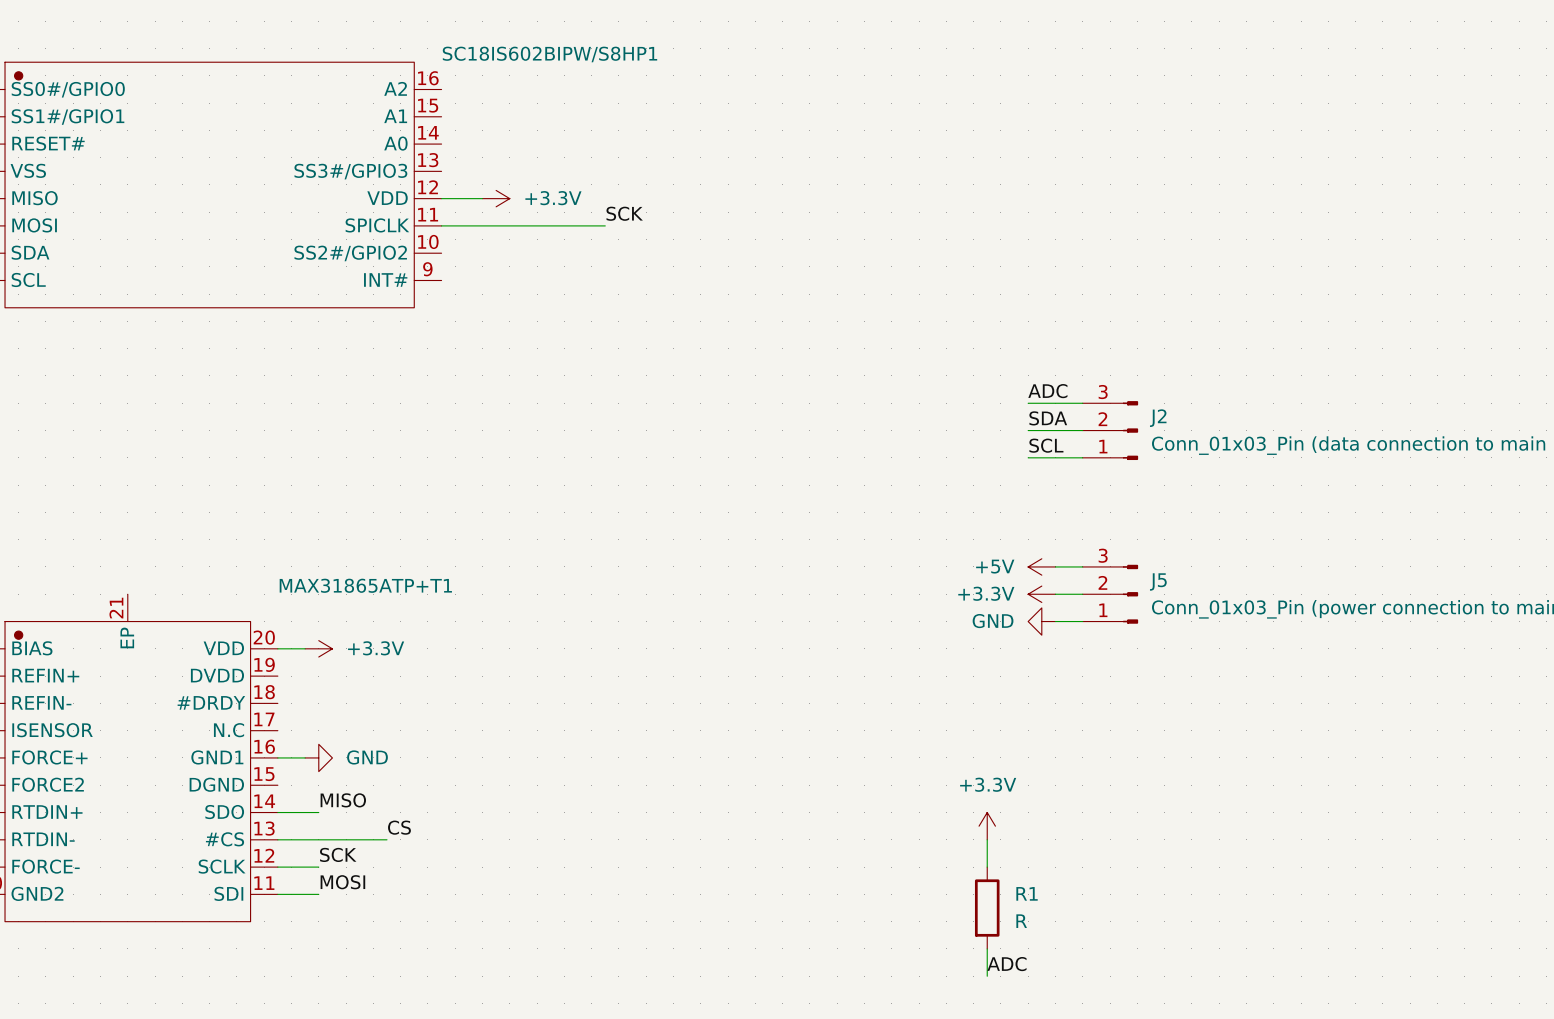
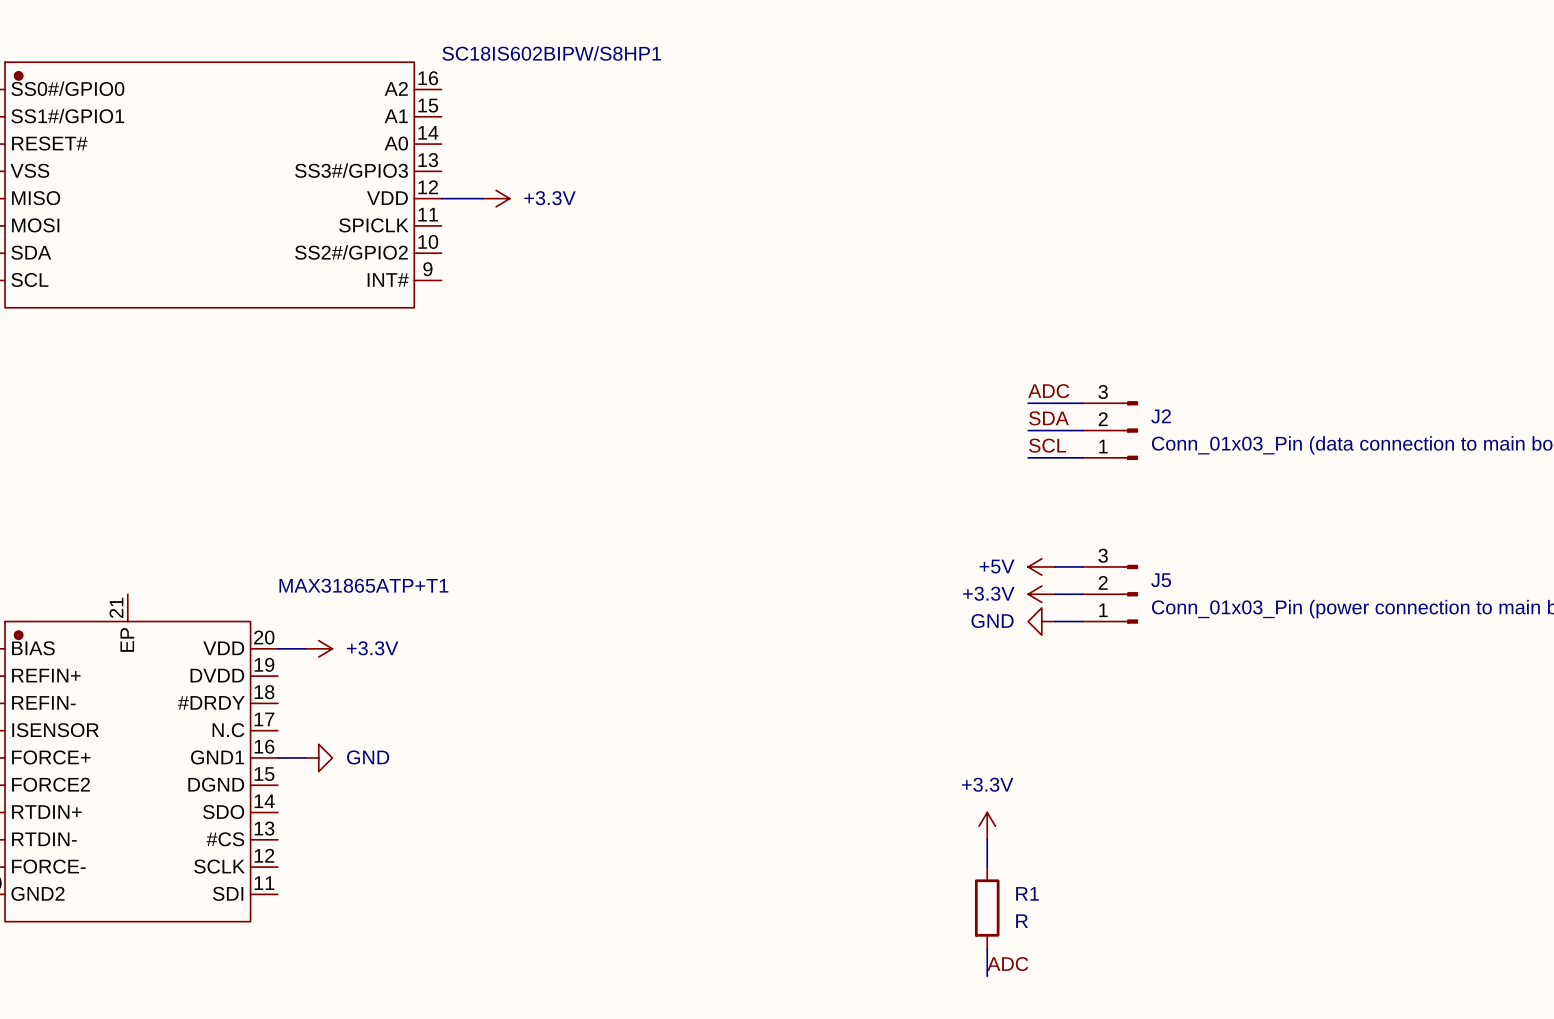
label: SCK (624, 213) -> none
wire: (441, 225) (605, 225) -> none
label: MISO (343, 800) -> none
wire: (277, 812) (318, 812) -> none
label: CS (399, 827) -> none
wire: (277, 839) (386, 839) -> none
label: SCK (338, 854) -> none
wire: (277, 867) (318, 867) -> none
label: MOSI (342, 882) -> none
wire: (277, 894) (318, 894) -> none

